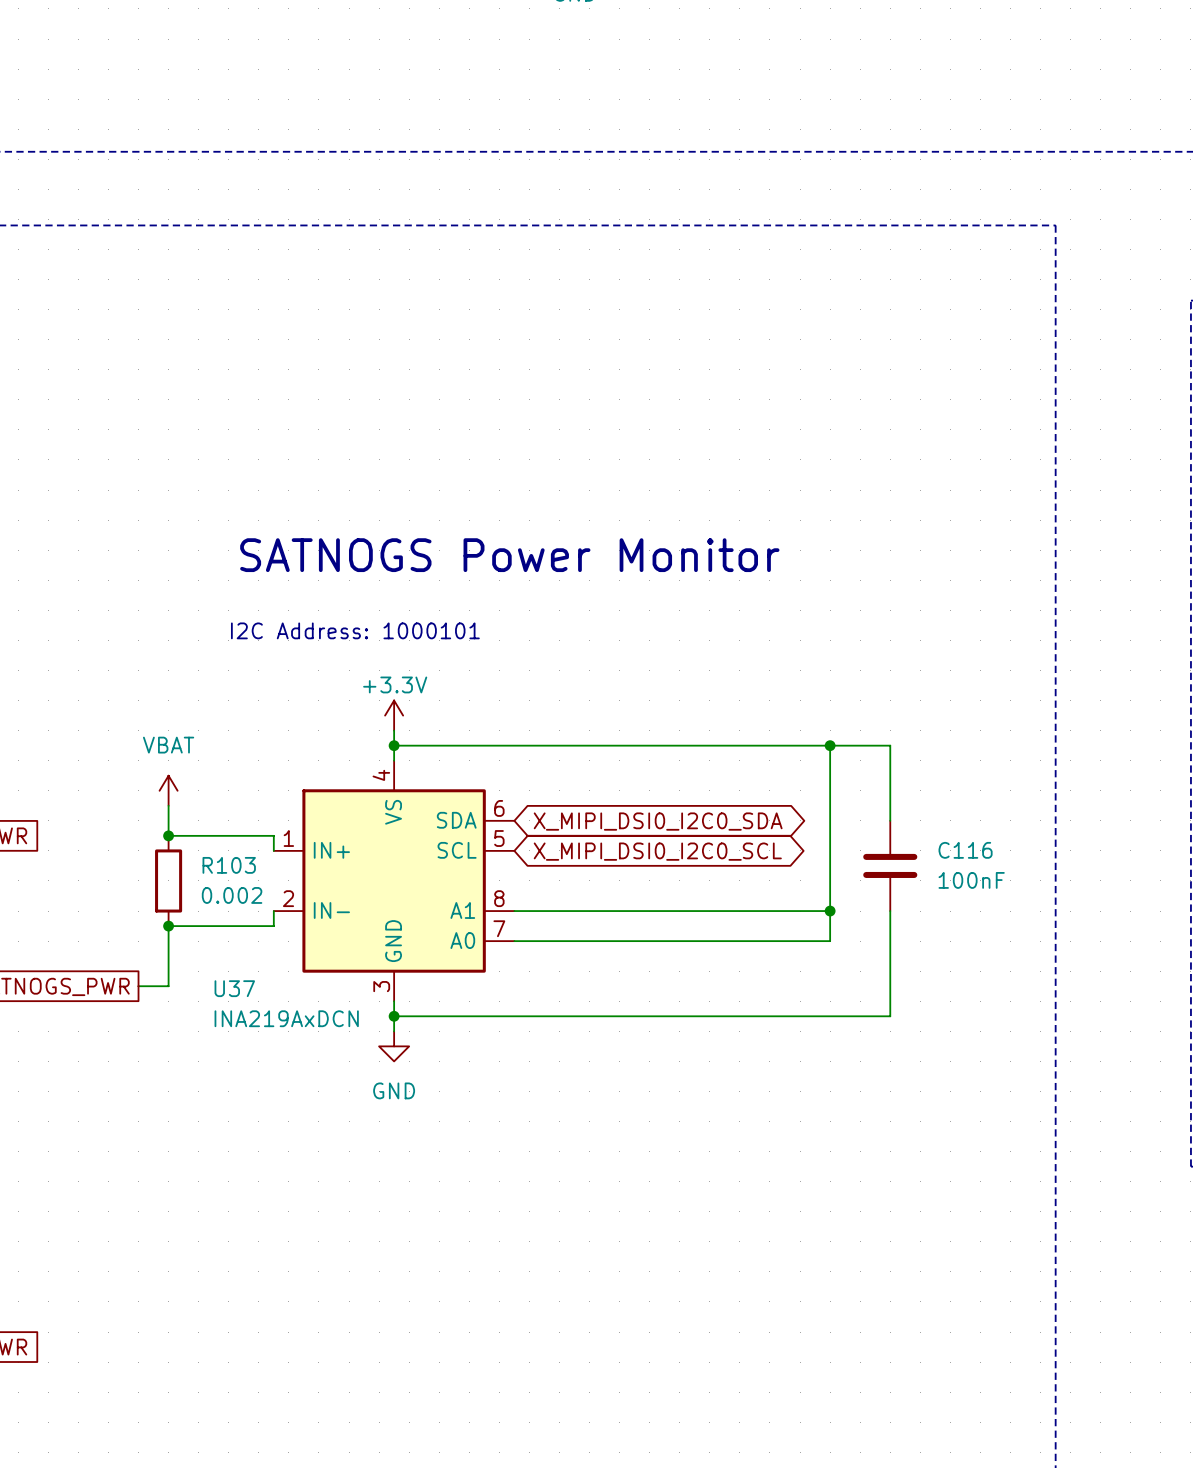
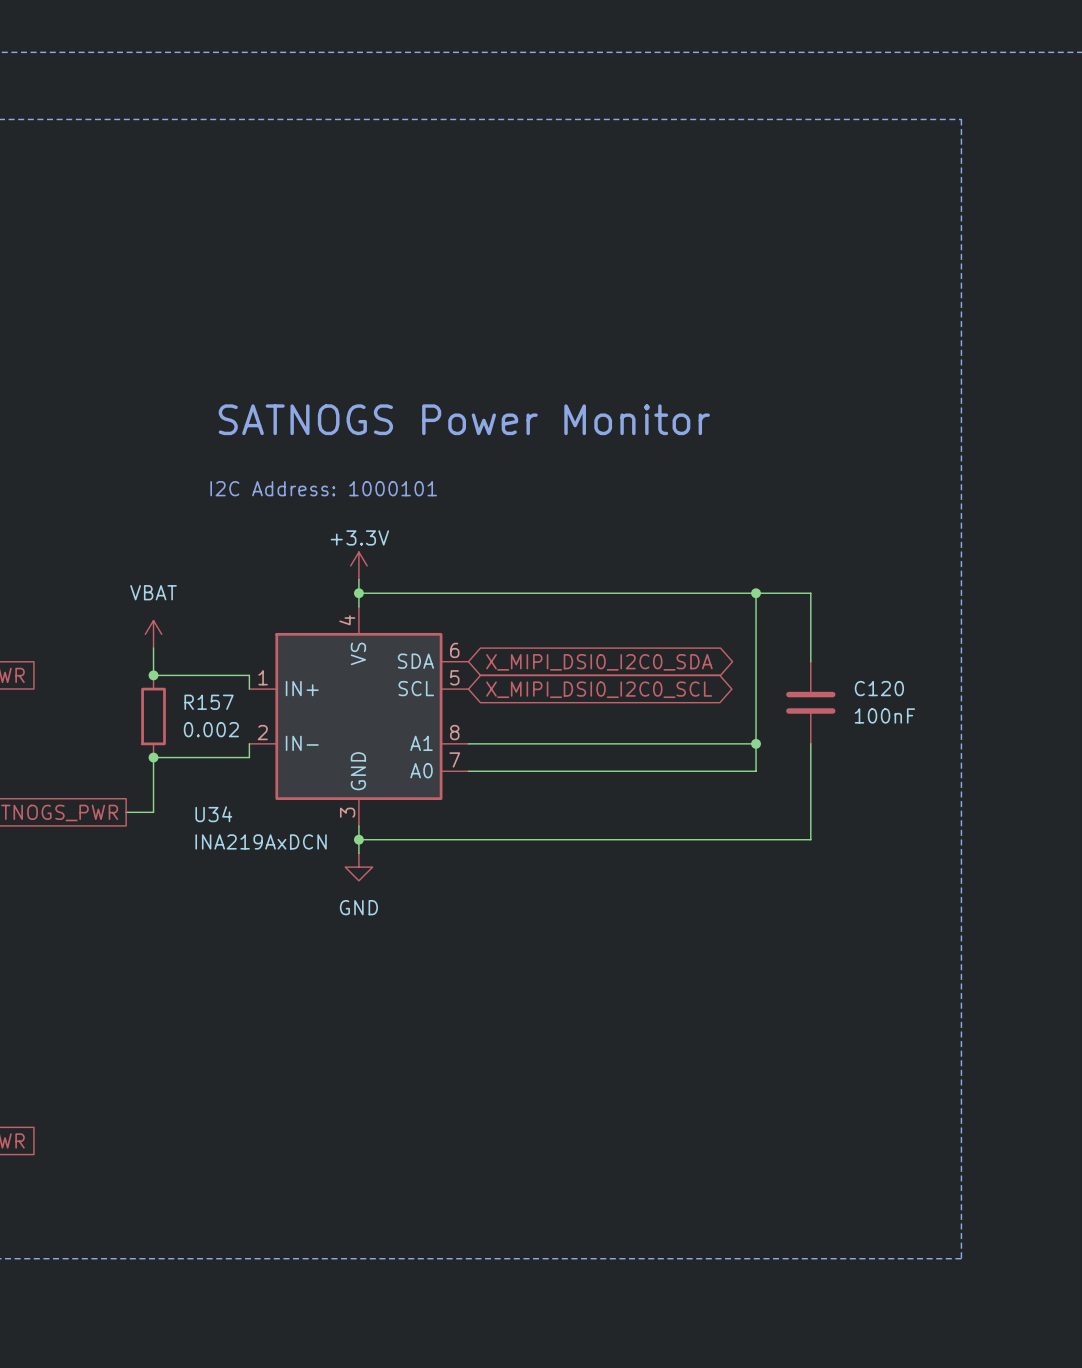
C116 name: C116 (965, 850) -> C120 (879, 688)
R103 name: R103 (229, 865) -> R157 (209, 702)
U37 name: U37 (234, 988) -> U34 (213, 814)

